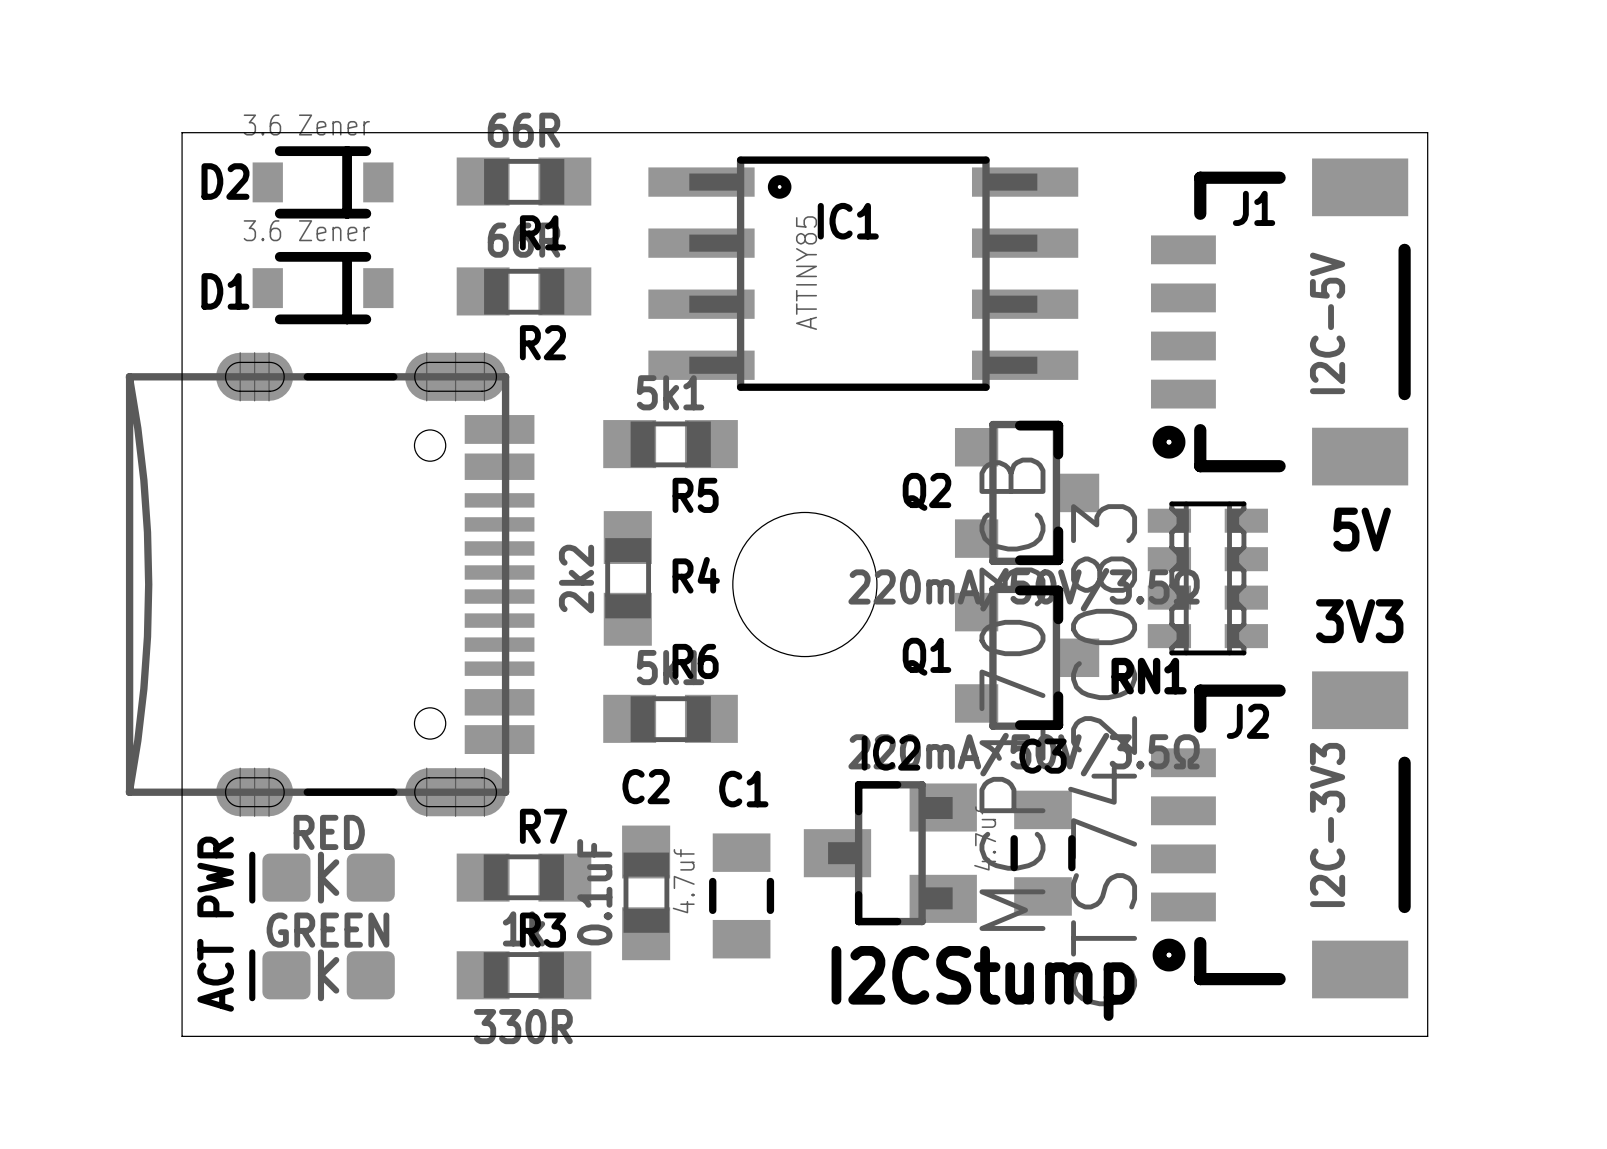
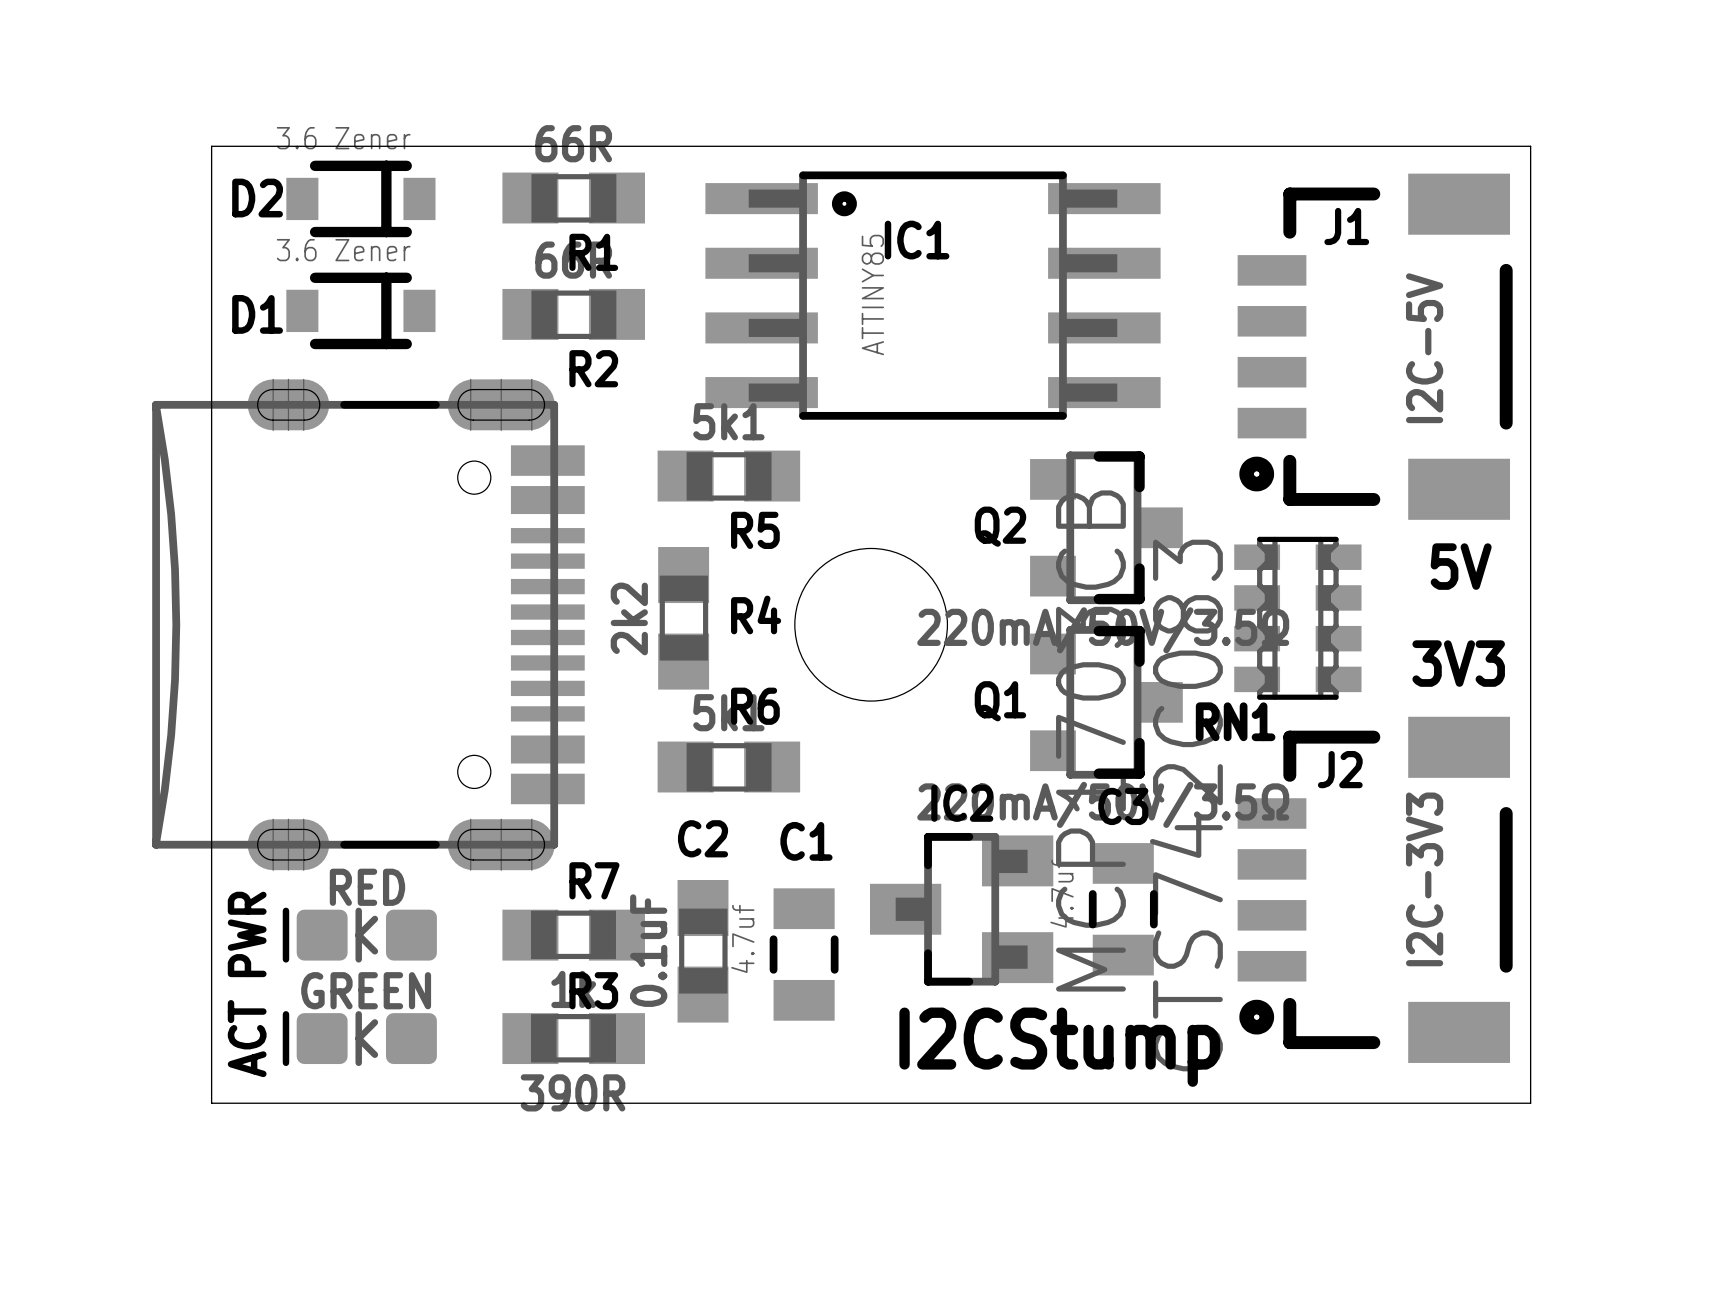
R3 value: 330R (523, 1026) -> 390R (573, 1092)

